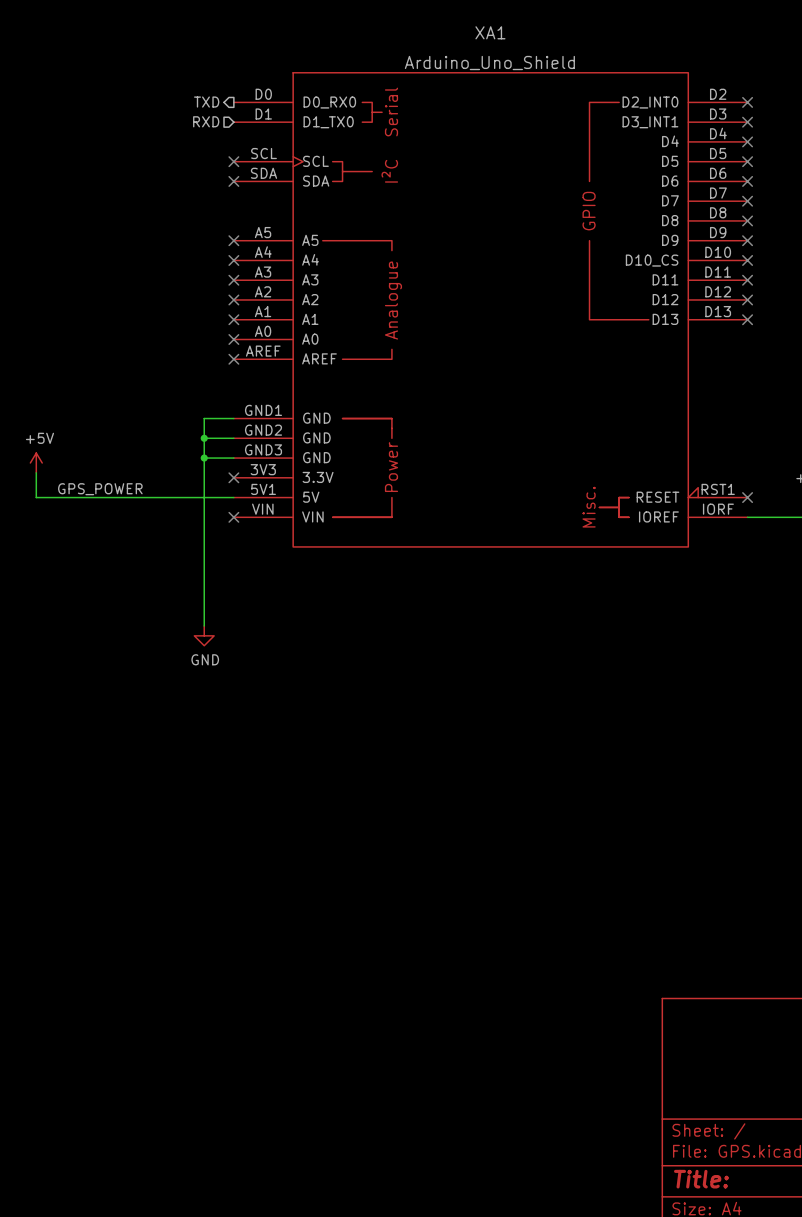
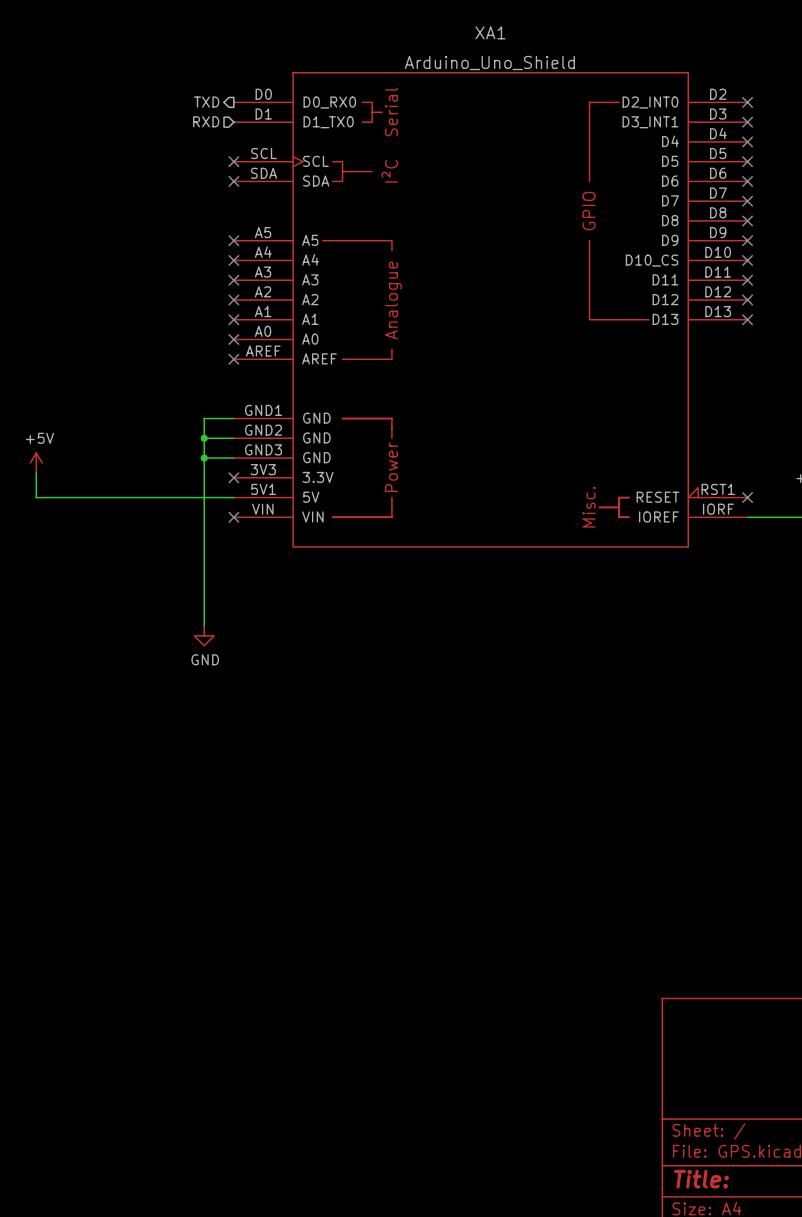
label: GPS_POWER (100, 489) -> none

